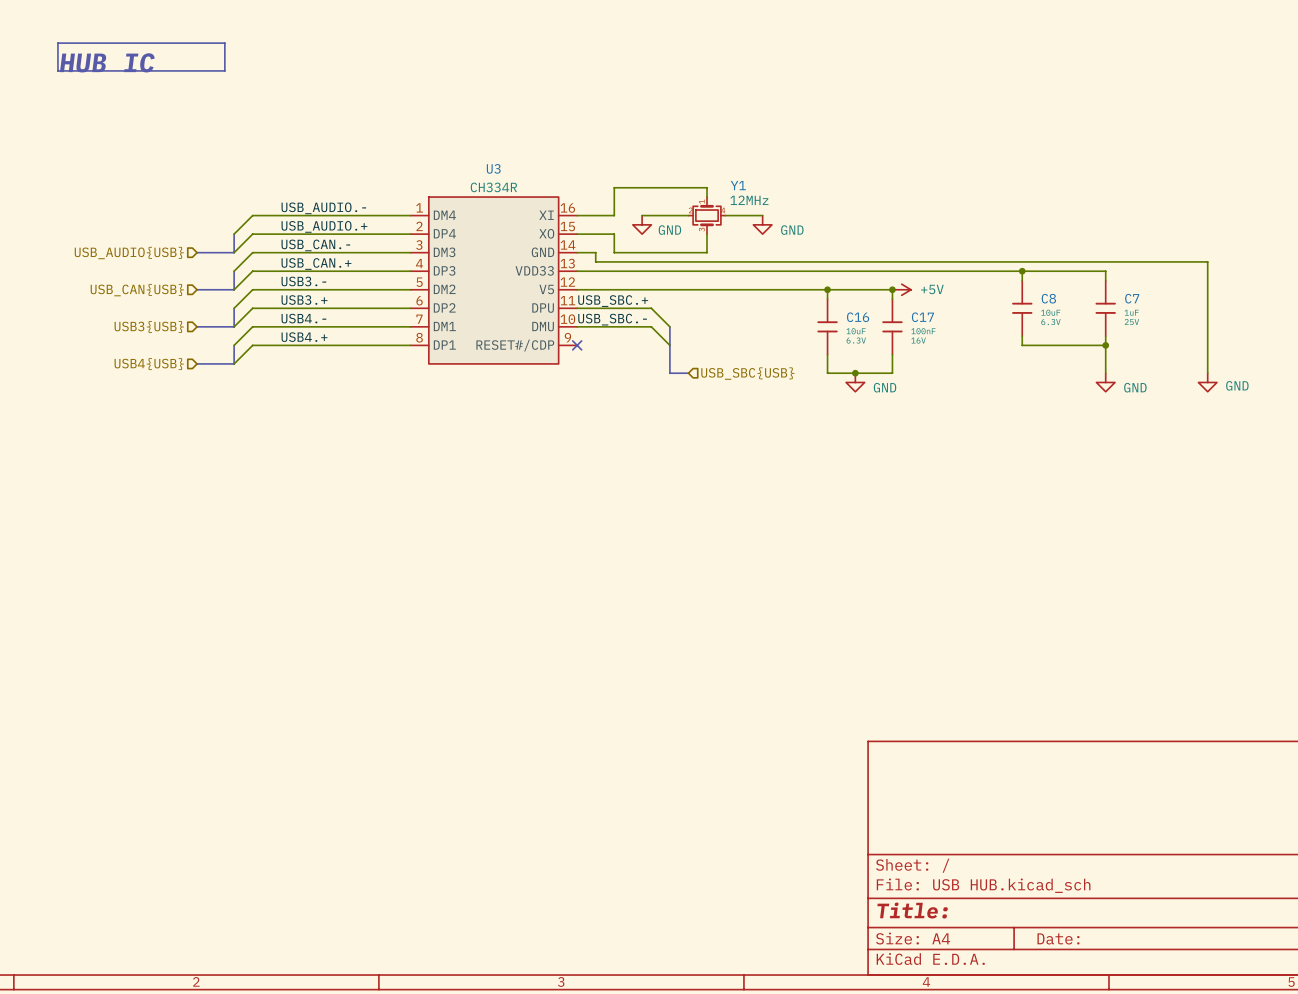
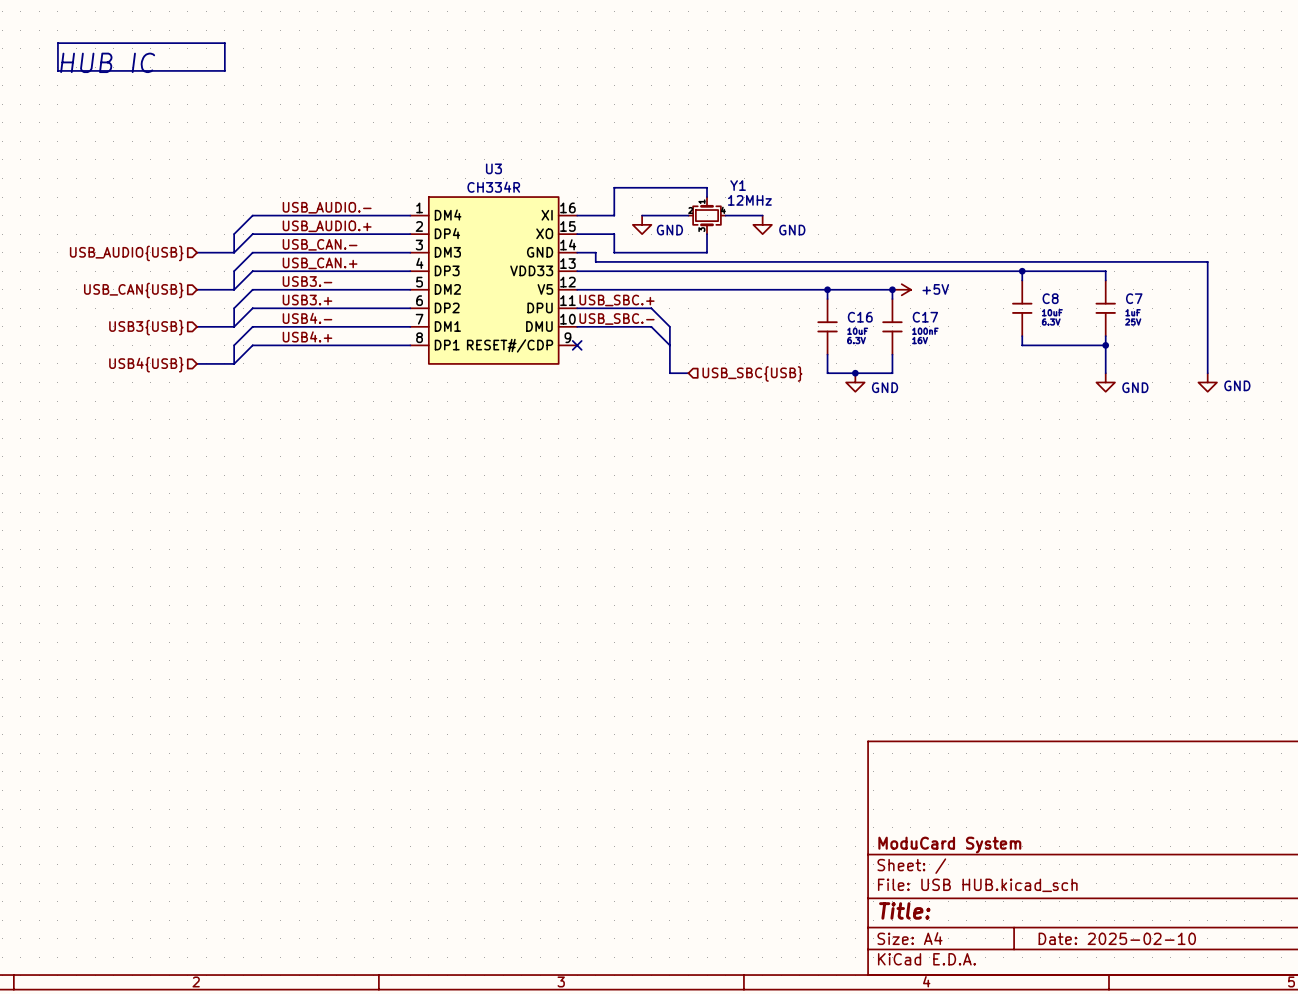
title block: none -> ModuCard System (949, 845)
title block: Date: (1058, 938) -> Date: 2025-02-10 (1117, 938)

